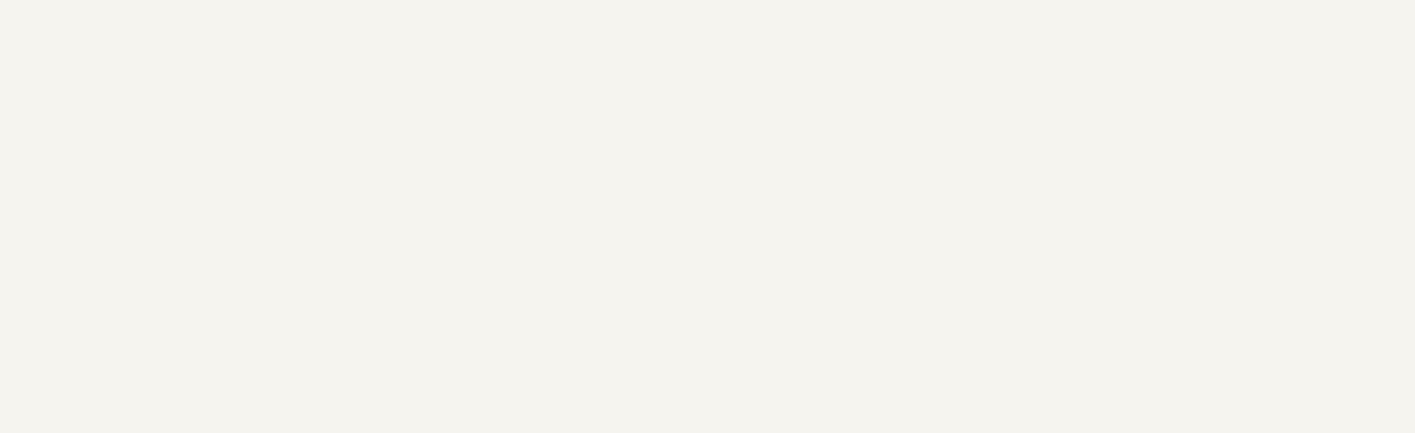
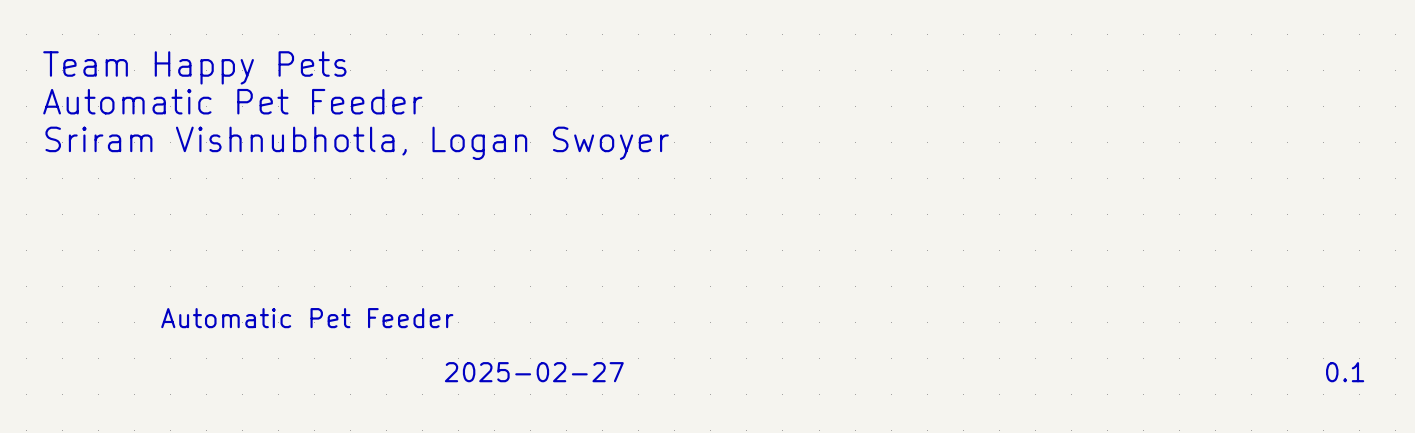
text: none -> Team Happy Pets (194, 67)
text: none -> Automatic Pet Feeder (232, 101)
text: none -> Sriram Vishnubhotla, Logan Swoyer (357, 143)
text: none -> Automatic Pet Feeder (307, 318)
text: none -> 2025-02-27 (534, 372)
text: none -> 0.1 (1345, 372)

